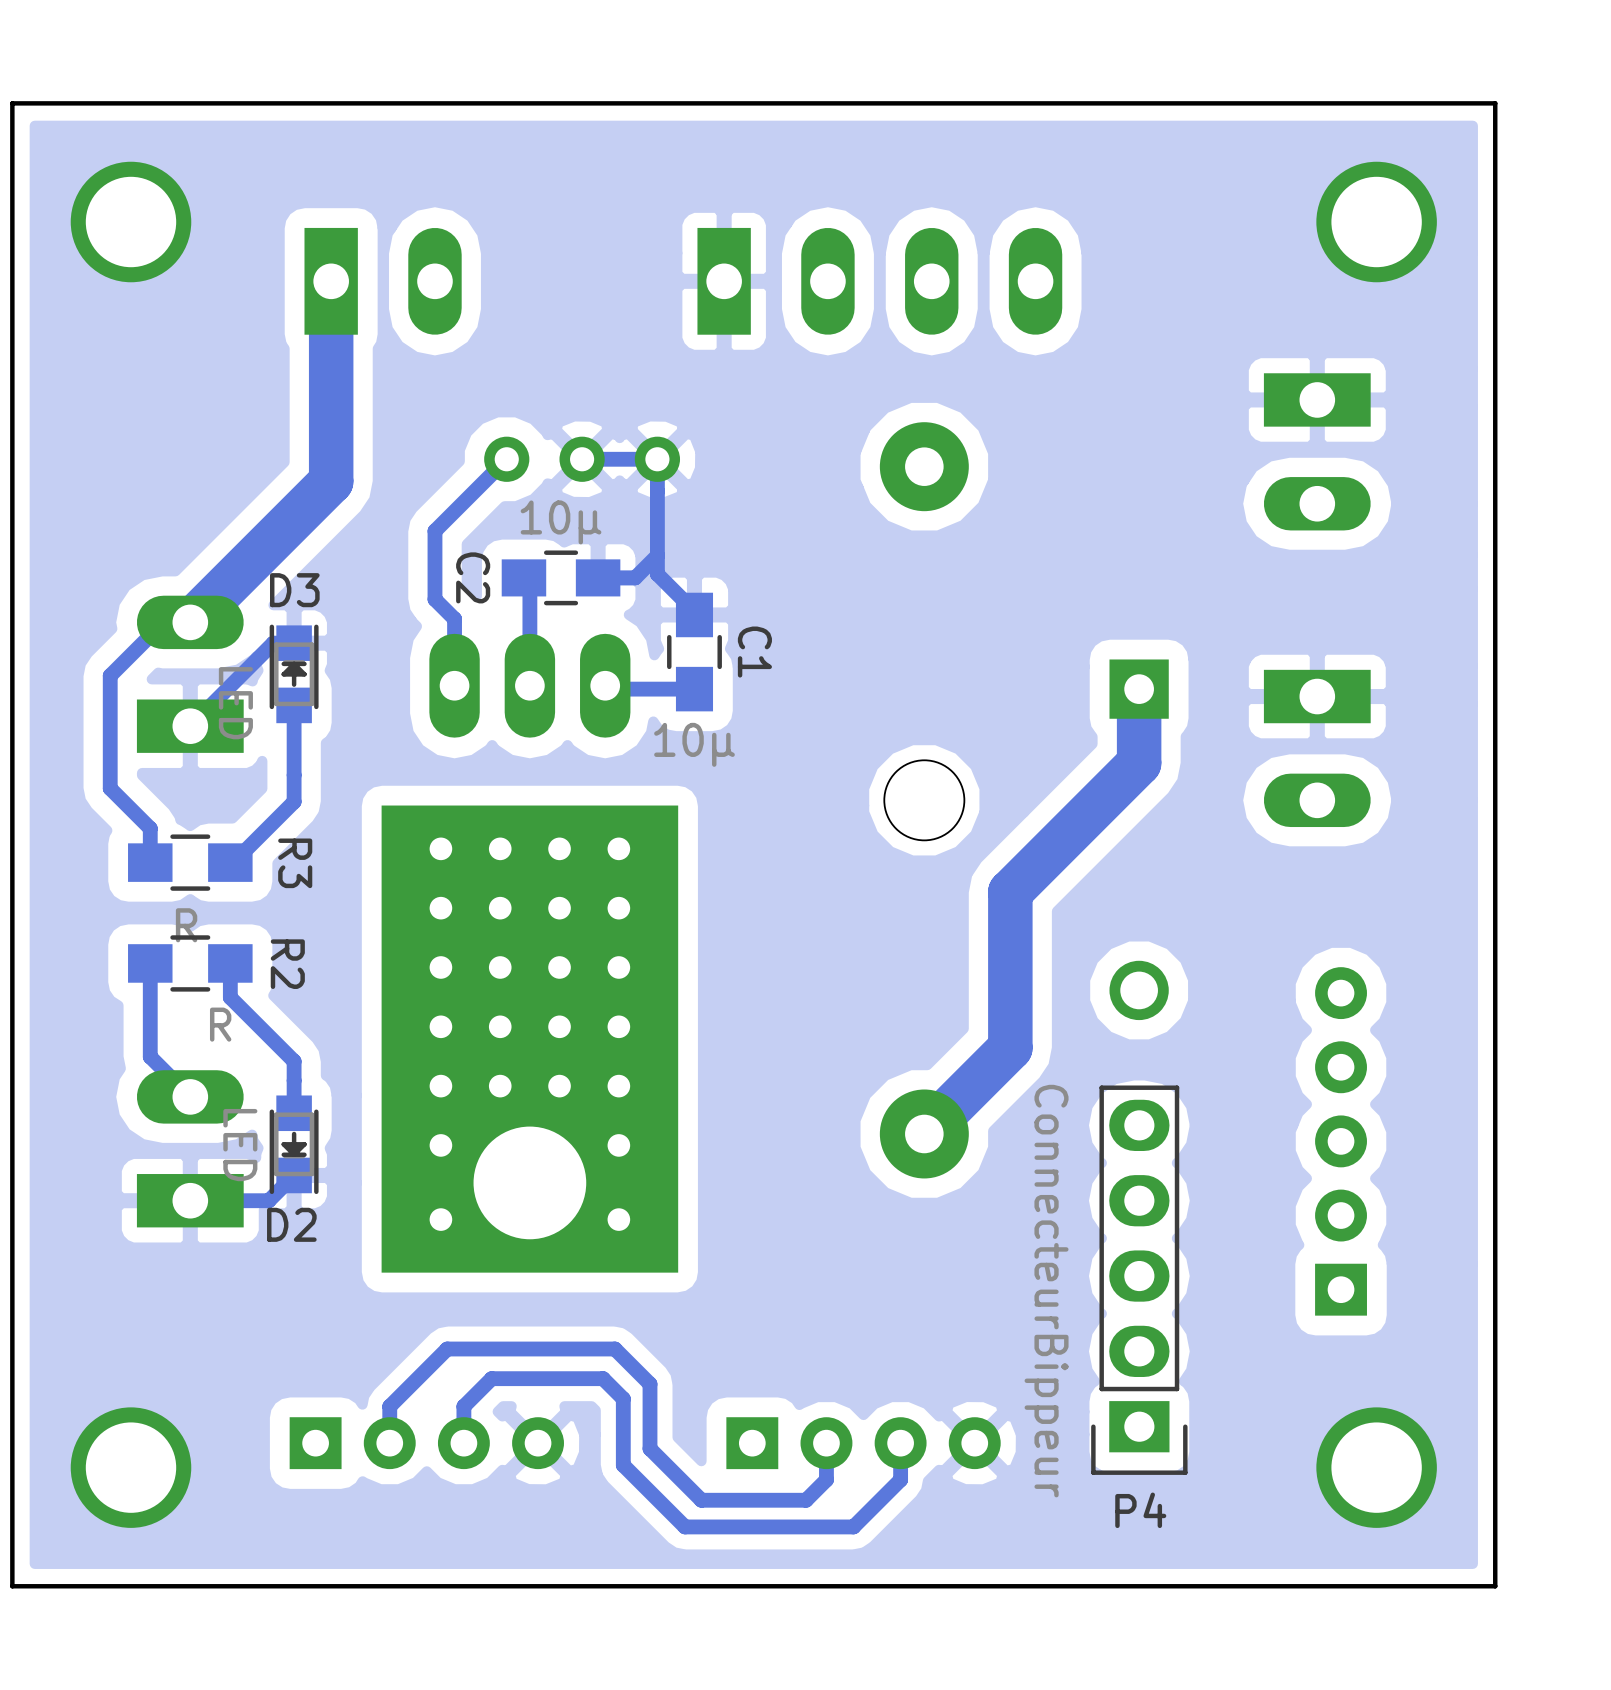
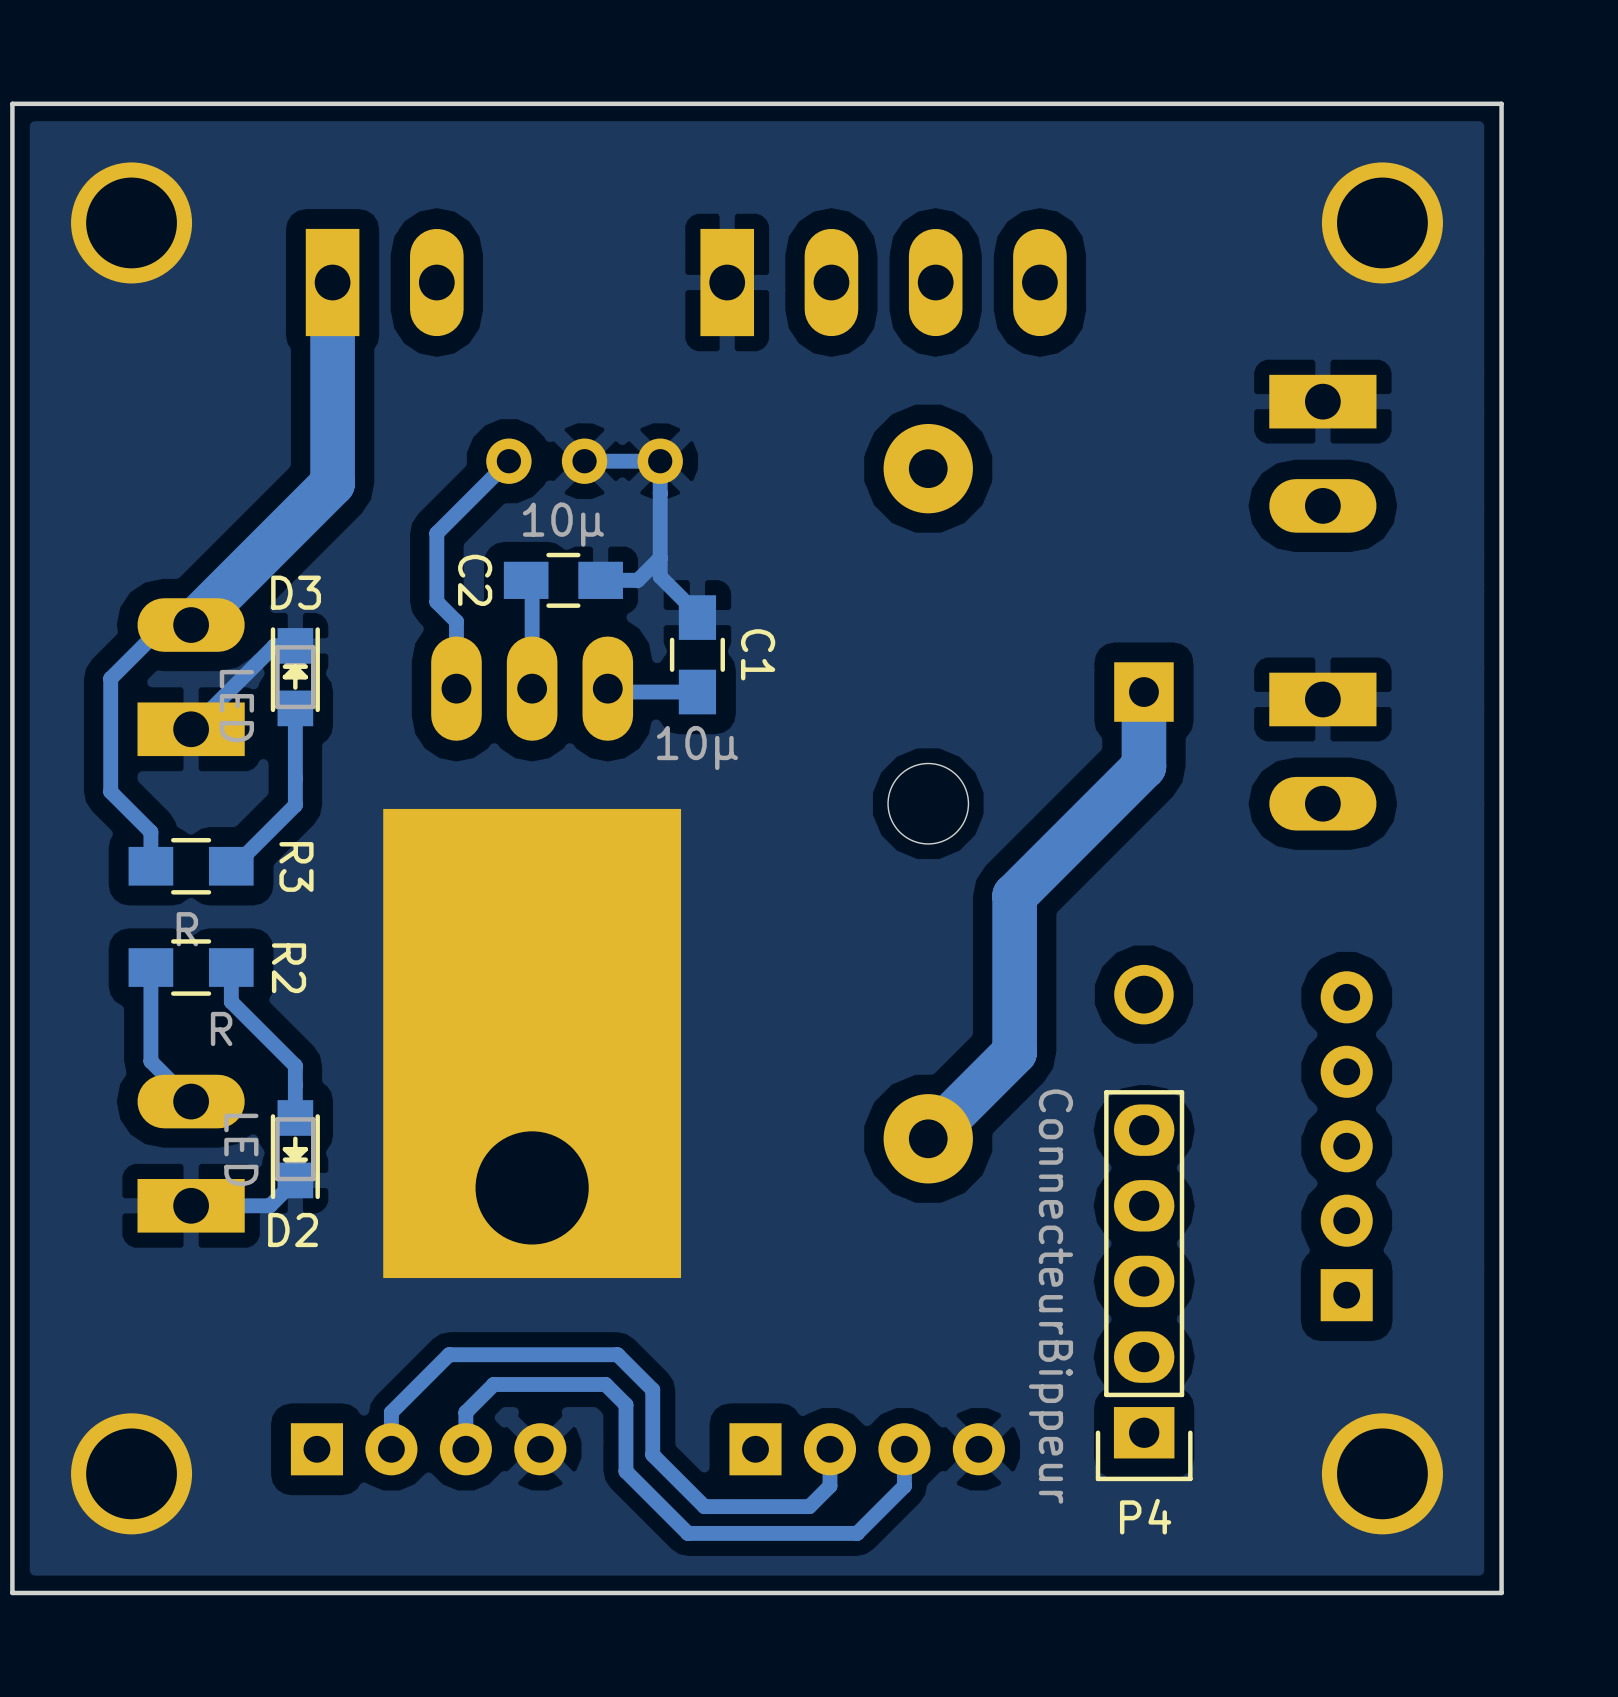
part footprint: [381, 633, 679, 1273] -> [383, 636, 682, 1279]

